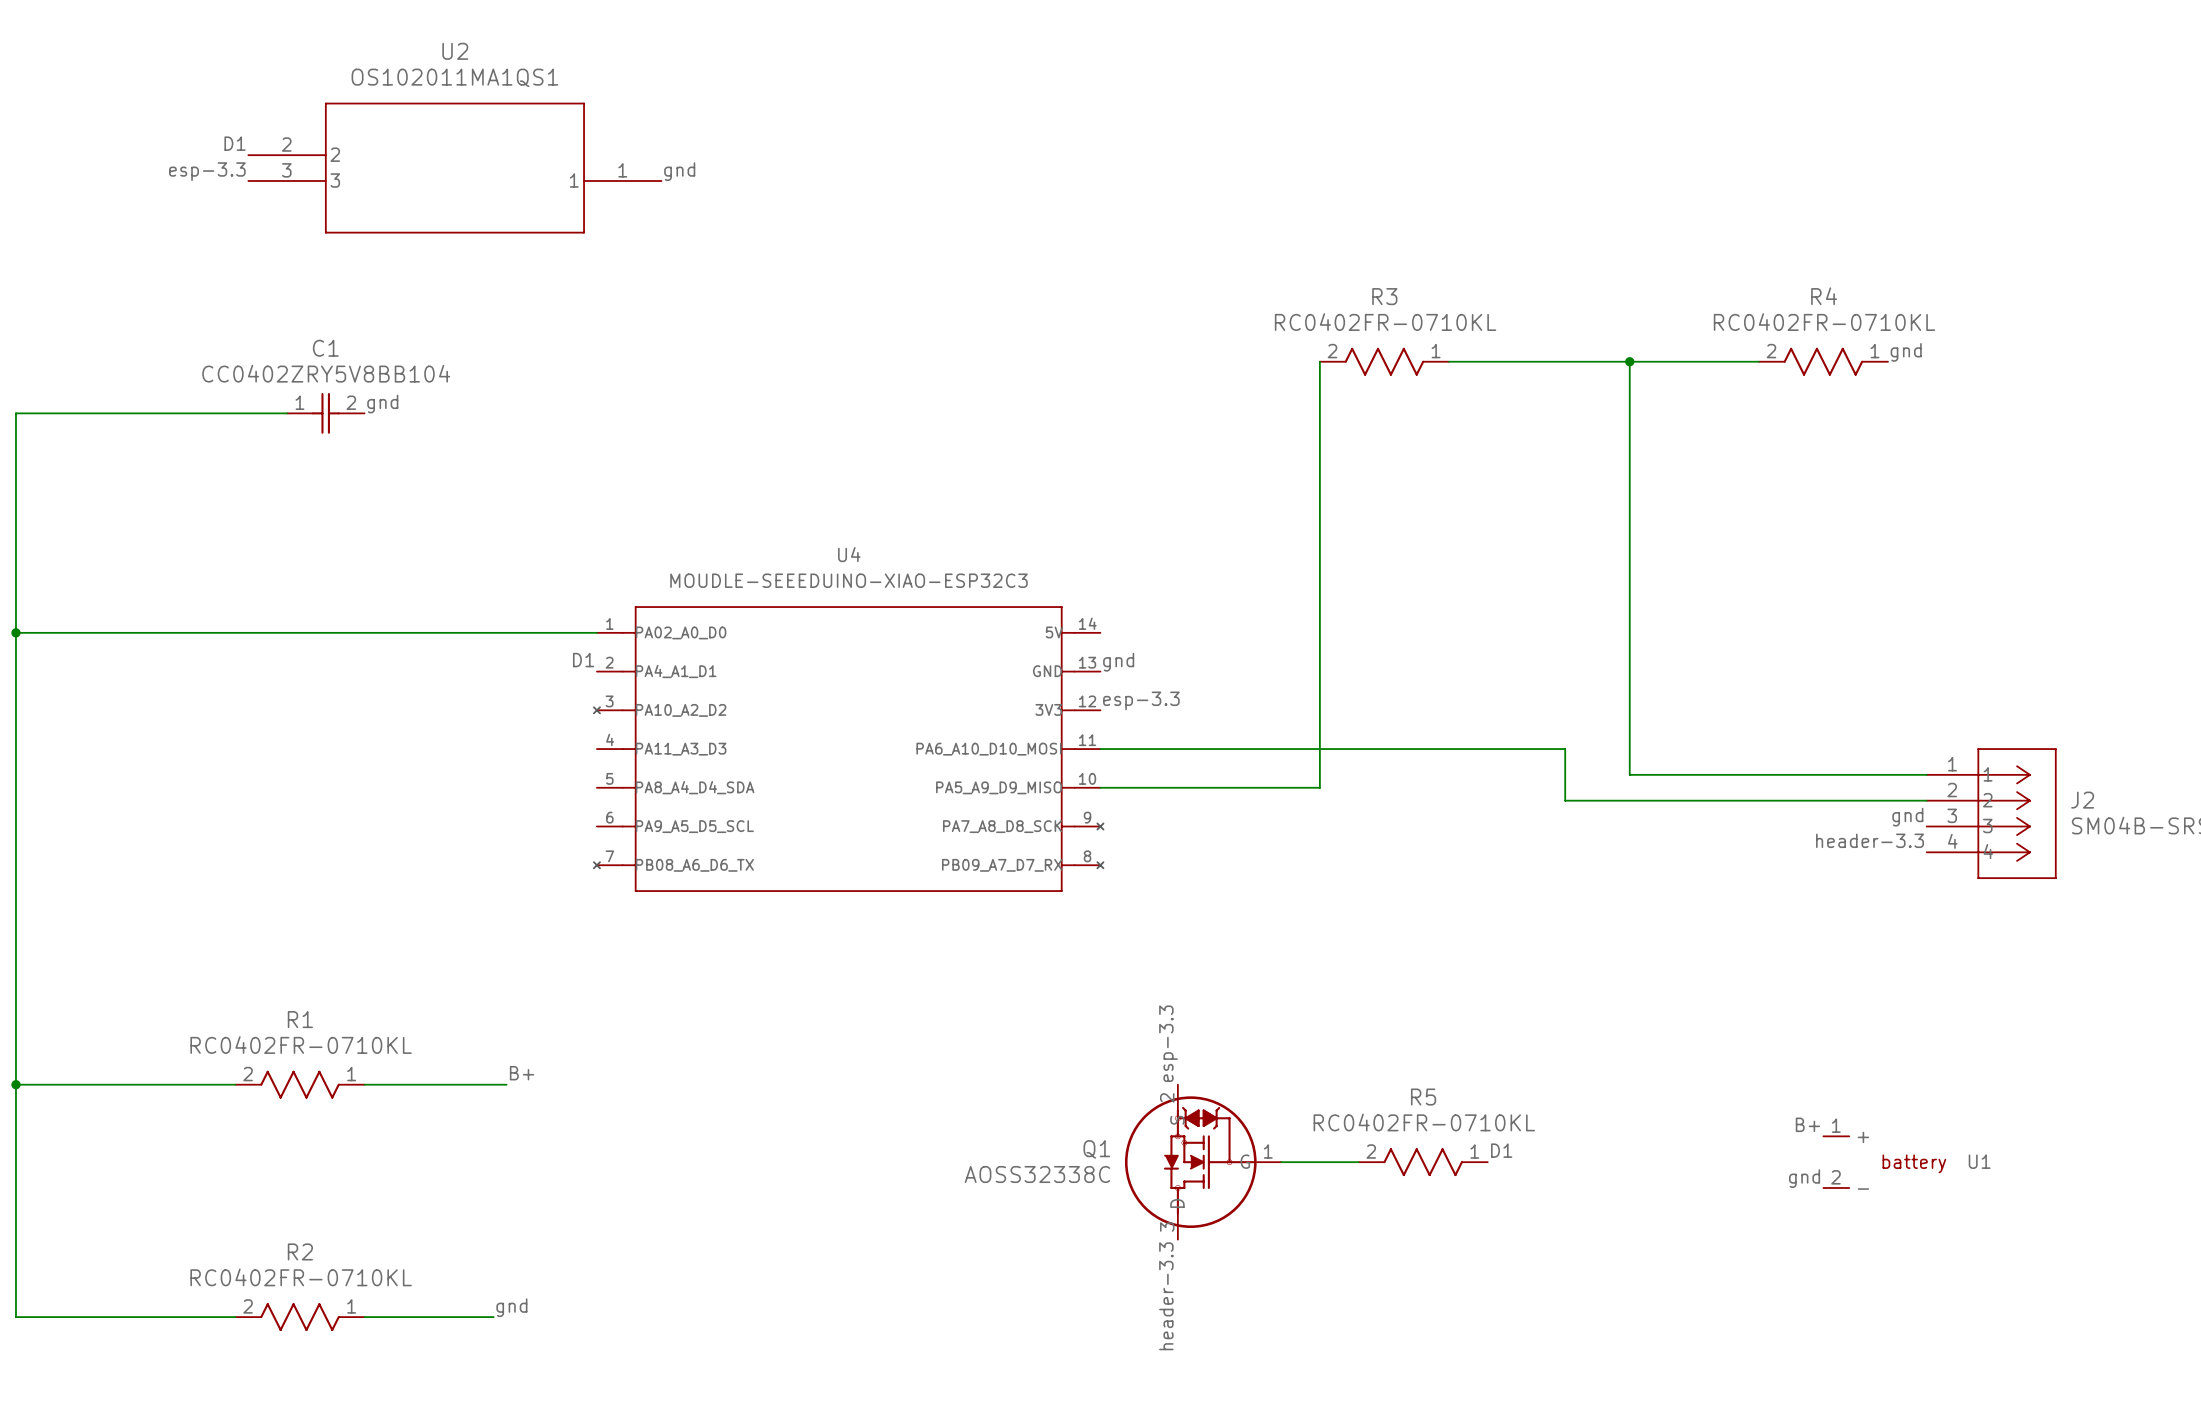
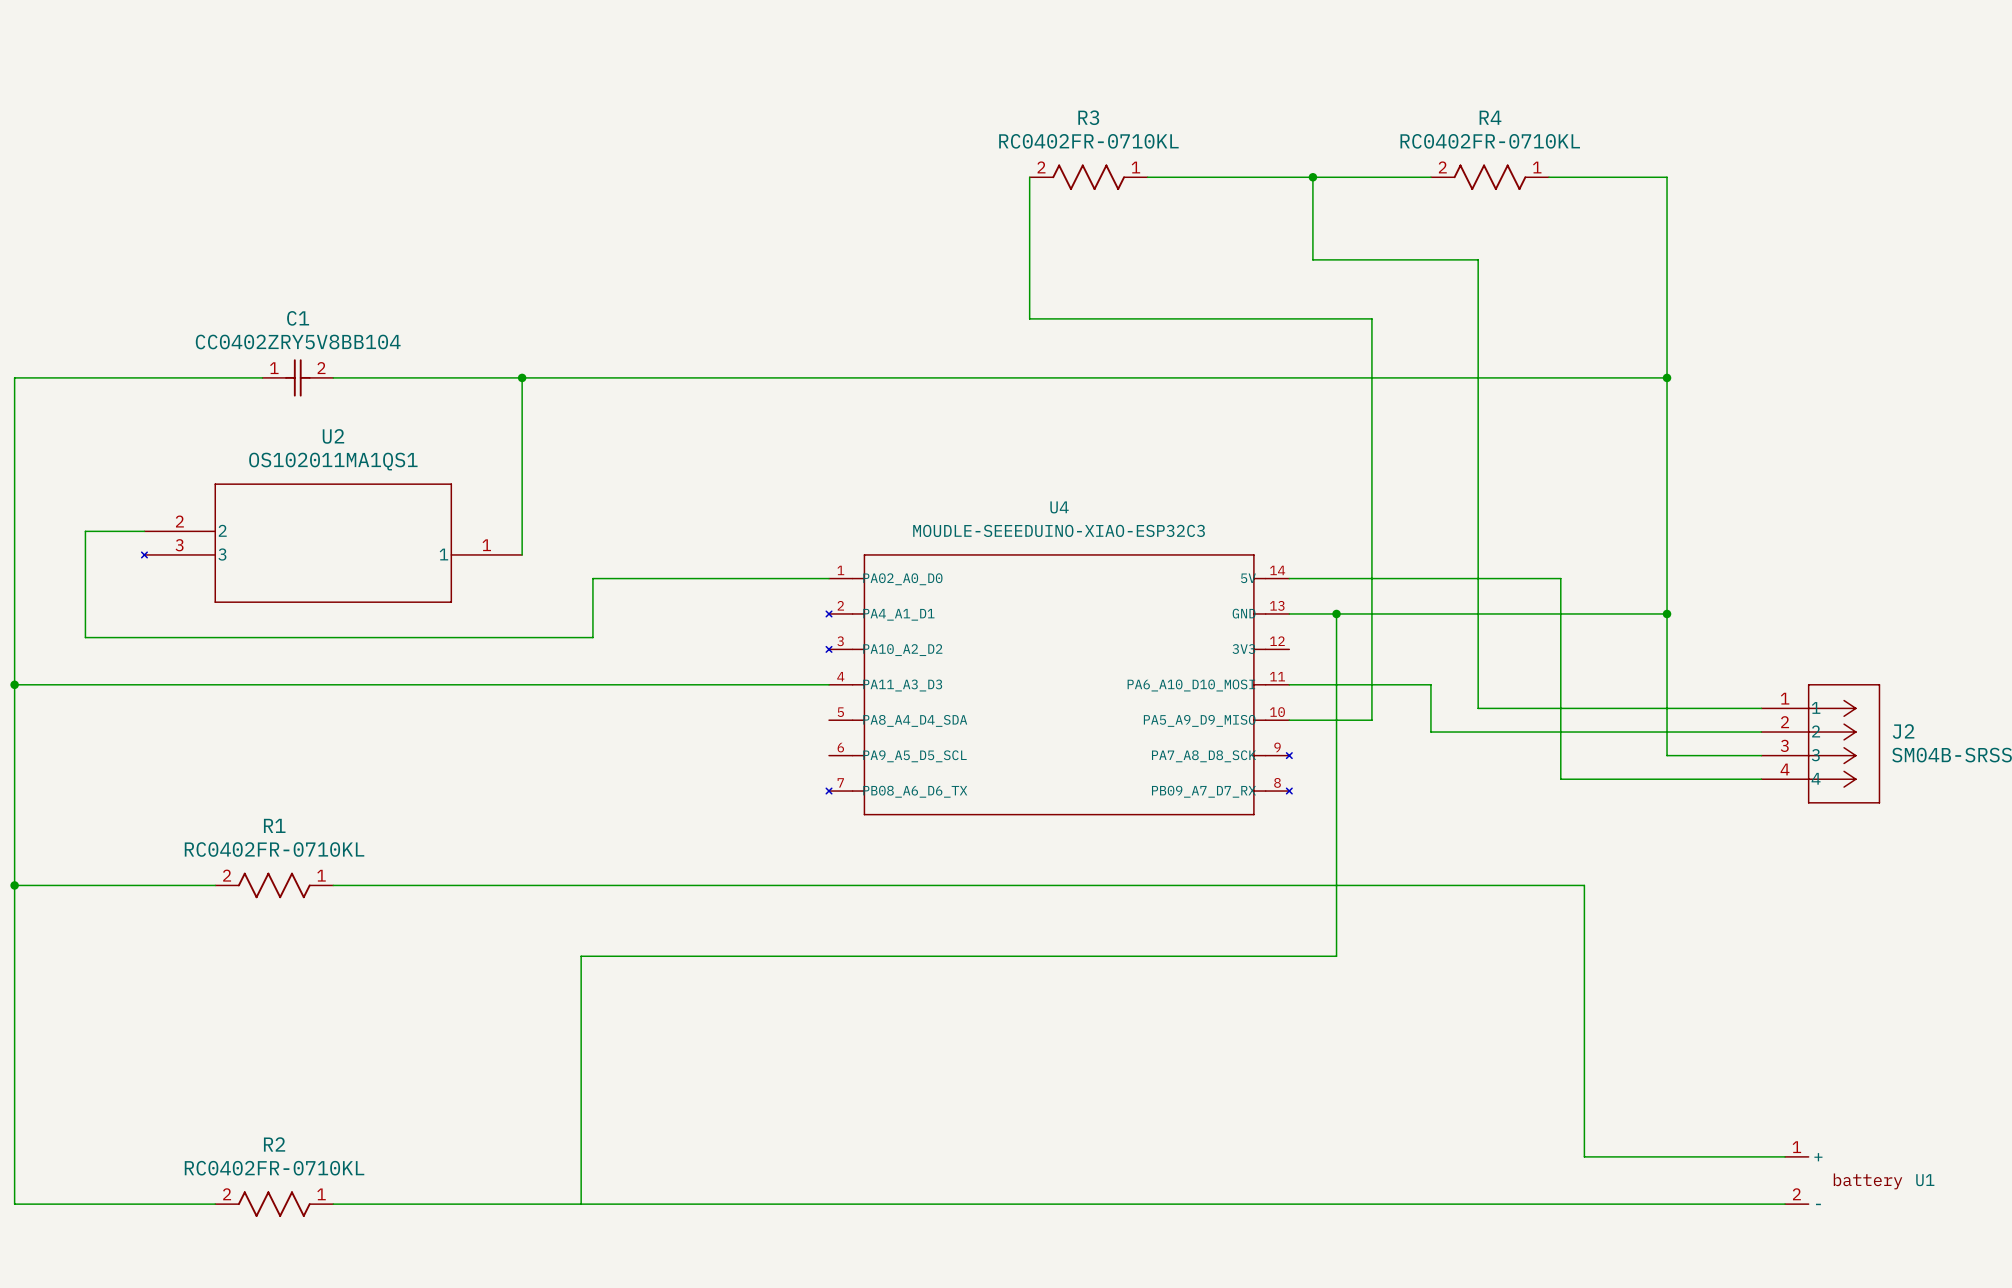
U2 symbol: [248, 102, 662, 234] -> [141, 483, 523, 603]
label: D1 (235, 143) -> none
label: esp-3.3 (207, 171) -> none
label: gnd (679, 171) -> none
wire: none -> (1029, 177) (1029, 318) (1371, 318) (1371, 720) (1289, 720)
wire: none -> (1147, 177) (1430, 177)
junction: none -> (1312, 177)
wire: none -> (1548, 177) (1667, 177) (1667, 755) (1761, 755)
label: gnd (1906, 352) -> none
wire: (1319, 361) (1319, 787) (1100, 787) -> none
R3 position: (1384, 361) -> (1088, 177)
wire: (1449, 361) (1758, 361) -> none
wire: (1629, 361) (1629, 774) -> (1312, 177) (1312, 259) (1478, 259) (1478, 708) (1489, 708)
junction: (1629, 361) -> none
R4 position: (1823, 361) -> (1489, 177)
label: gnd (382, 404) -> none
wire: none -> (333, 377) (1667, 377)
wire: none -> (522, 377) (522, 554)
junction: none -> (522, 377)
junction: none -> (1667, 377)
wire: none -> (144, 531) (85, 531) (85, 637) (592, 637) (592, 578) (829, 578)
U4 symbol: [593, 606, 1104, 892] -> [826, 554, 1293, 816]
wire: (15, 632) (596, 632) -> none
junction: (15, 632) -> none
wire: none -> (1289, 578) (1560, 578) (1560, 779) (1761, 779)
label: D1 (583, 660) -> none
label: gnd (1118, 662) -> none
wire: none -> (1289, 613) (1667, 613)
wire: none -> (1336, 613) (1336, 956) (581, 956) (581, 1204)
junction: none -> (1336, 613)
junction: none -> (1667, 613)
label: esp-3.3 (1141, 700) -> none
wire: none -> (14, 684) (829, 684)
junction: none -> (14, 684)
wire: (1100, 749) (1410, 749) -> none
label: gnd (1907, 817) -> none
label: header-3.3 (1870, 840) -> none
junction: none -> (14, 885)
wire: none -> (333, 885) (1584, 885) (1584, 1156) (1785, 1156)
label: esp-3.3 (1168, 1043) -> none
label: B+ (522, 1073) -> none
wire: (15, 1084) (235, 1084) -> (14, 885) (215, 885)
junction: (15, 1084) -> none
R1 position: (300, 1084) -> (274, 885)
wire: (364, 1084) (506, 1084) -> none
label: B+ (1807, 1124) -> none
label: D1 (1501, 1150) -> none
Q1: AOSS32338C (1203, 1162) -> none
wire: (1281, 1162) (1358, 1162) -> none
R5: RC0402FR-0710KL (1423, 1162) -> none
U1 position: (1836, 1162) -> (1796, 1180)
label: gnd (1804, 1178) -> none
label: header-3.3 (1166, 1296) -> none
label: gnd (511, 1307) -> none
wire: none -> (451, 1204) (1785, 1204)

